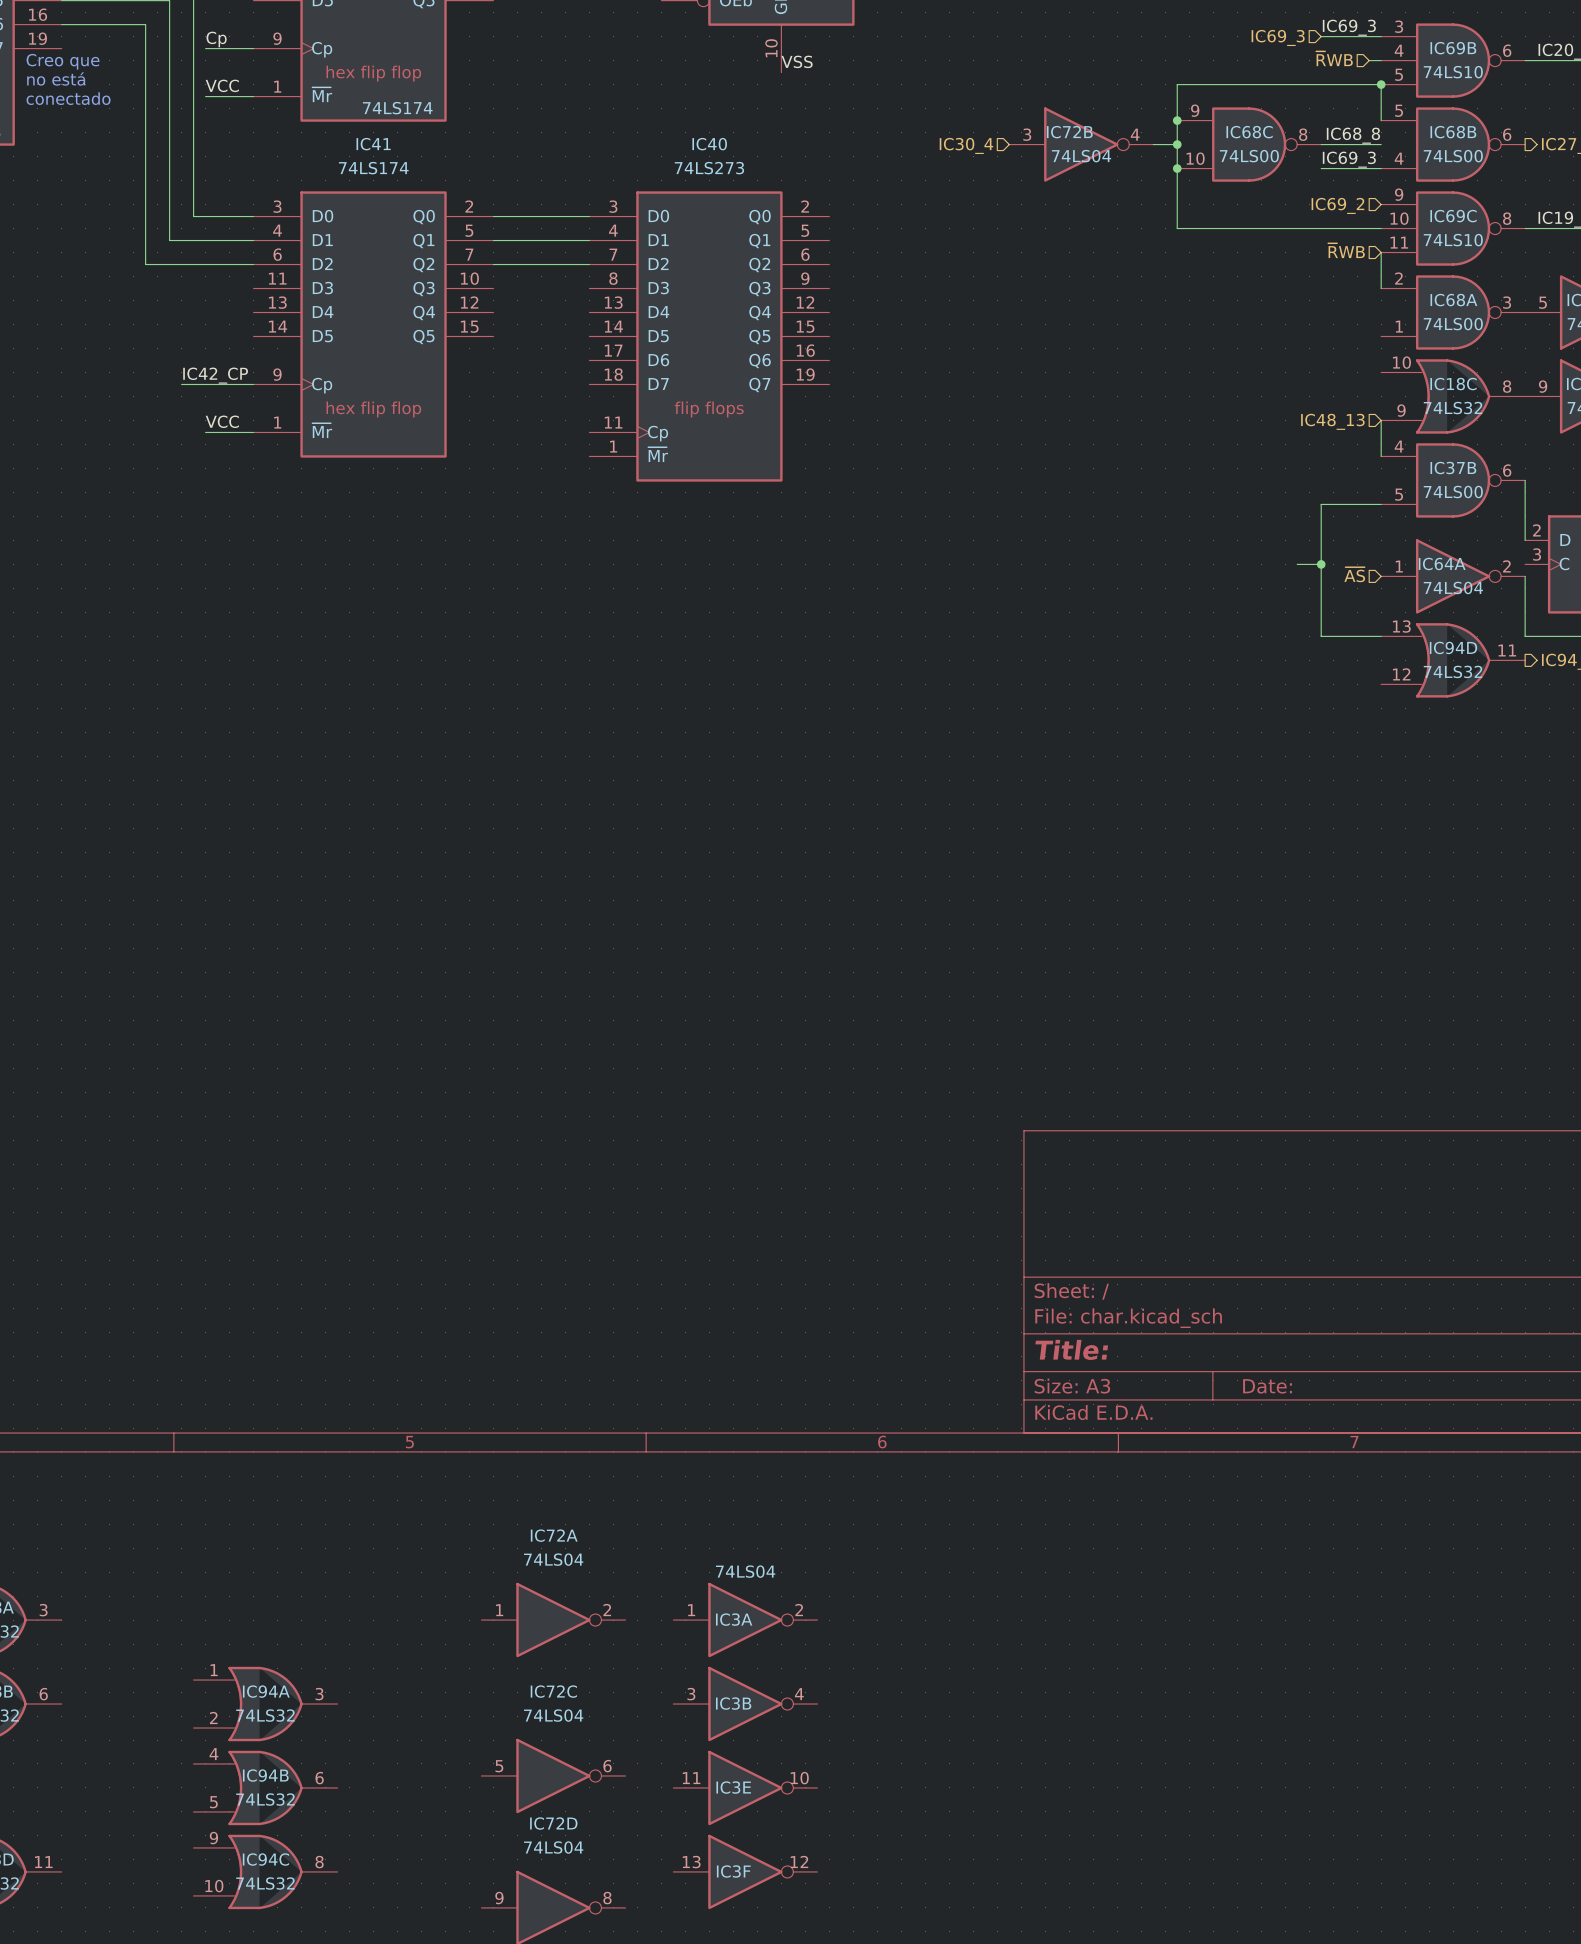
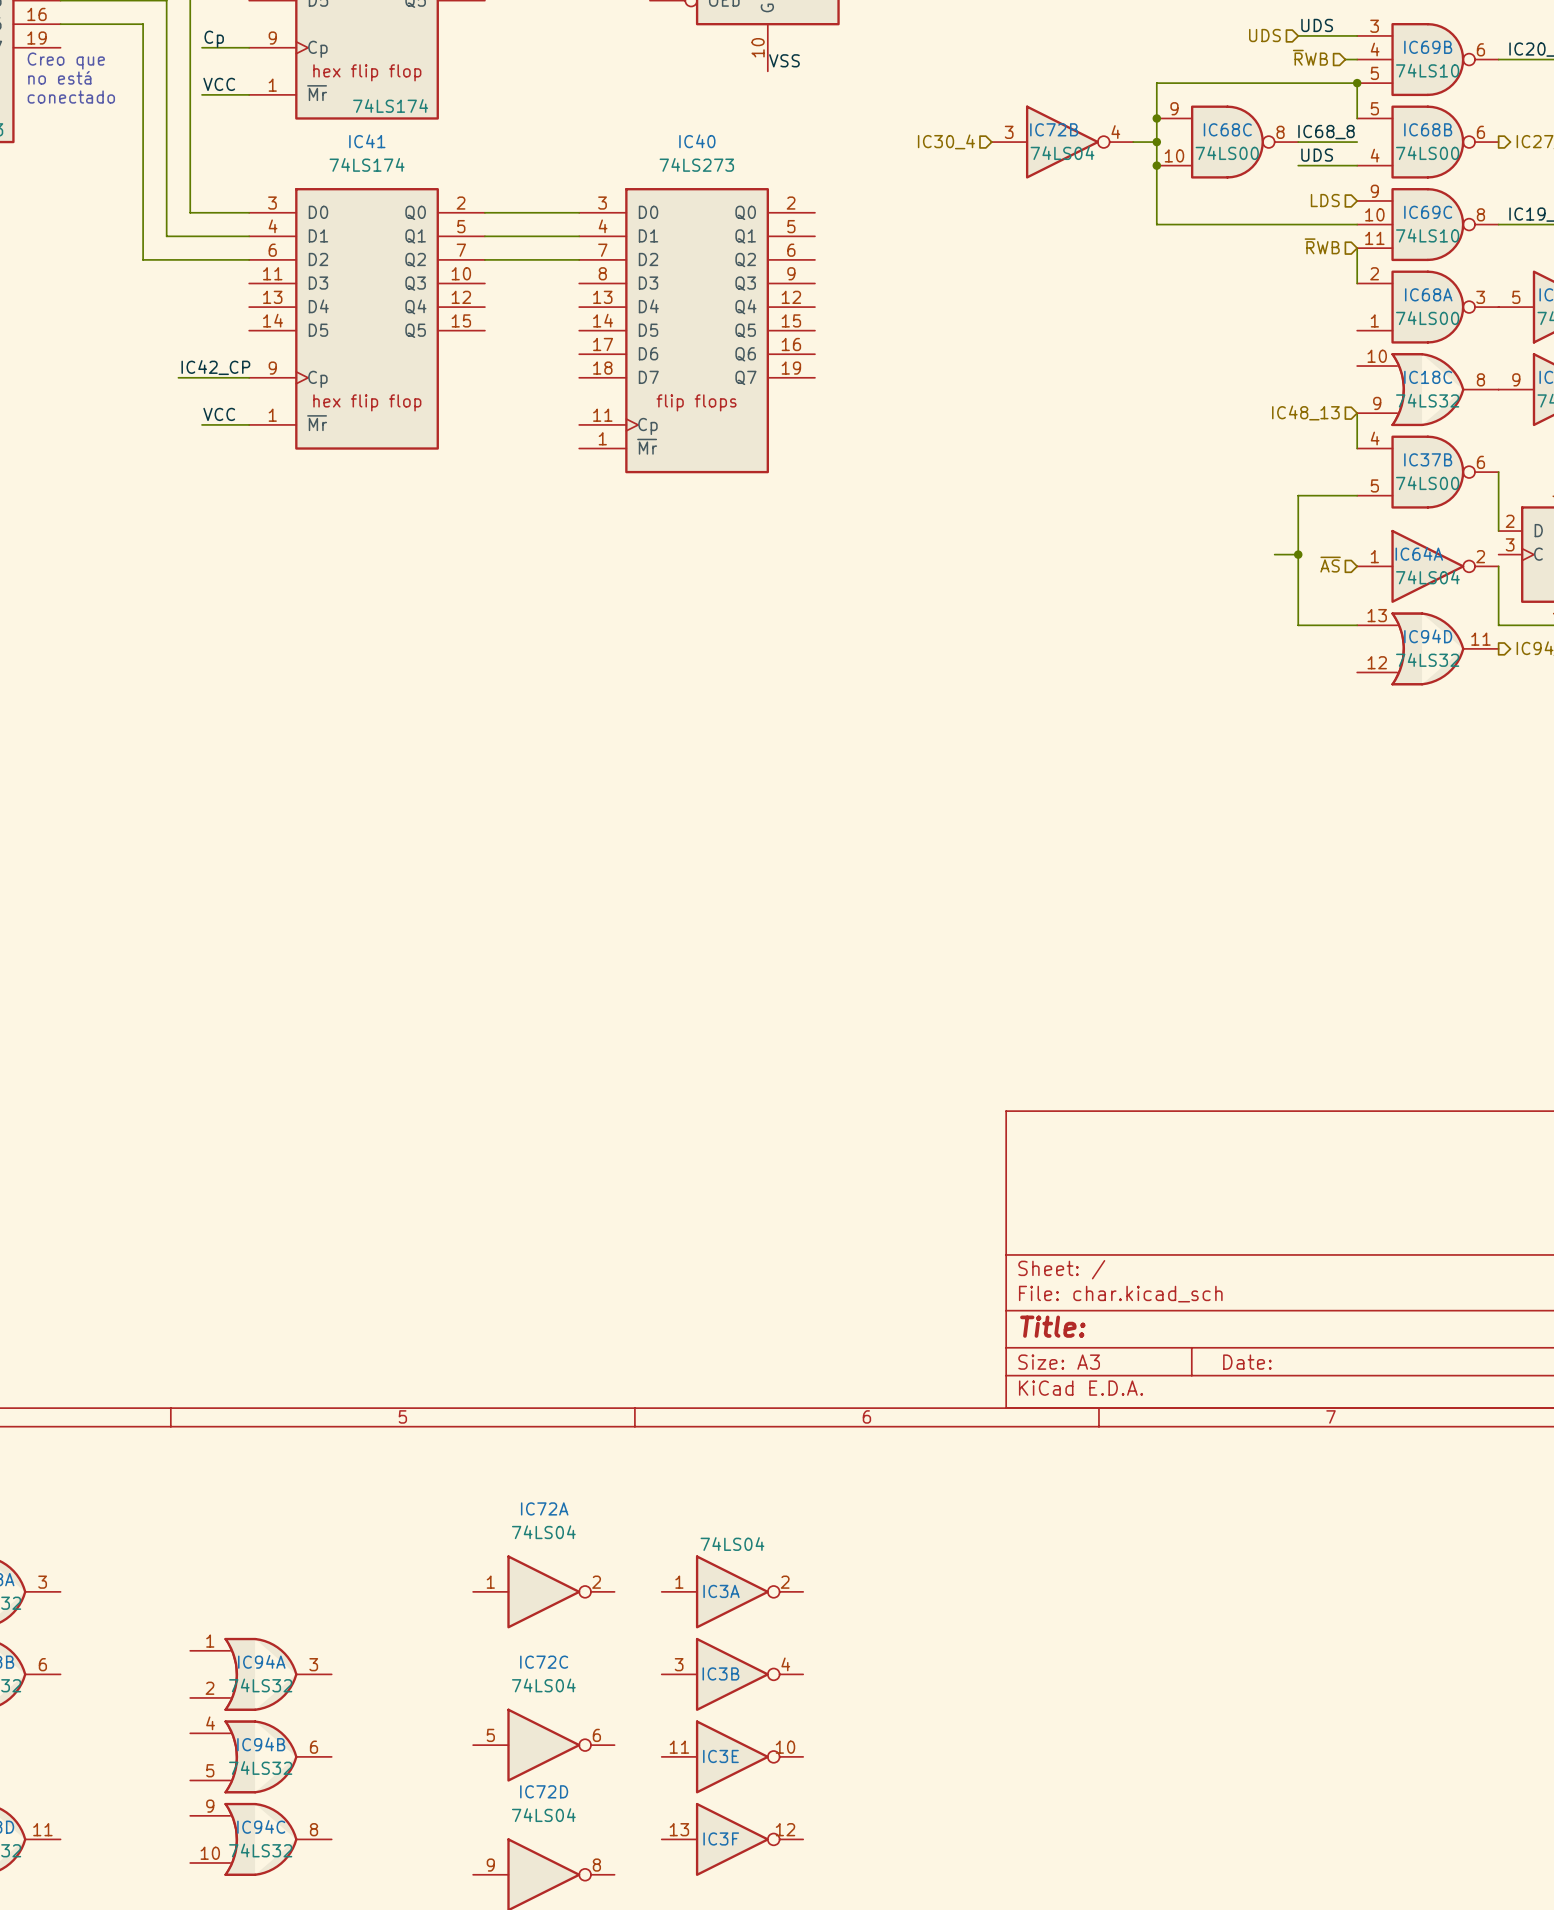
label: IC69_3 (1349, 27) -> UDS (1317, 25)
hierarchical label: IC69_3 (1278, 37) -> UDS (1264, 35)
label: IC69_3 (1349, 159) -> UDS (1317, 155)
hierarchical label: IC69_2 (1337, 205) -> LDS (1325, 200)

